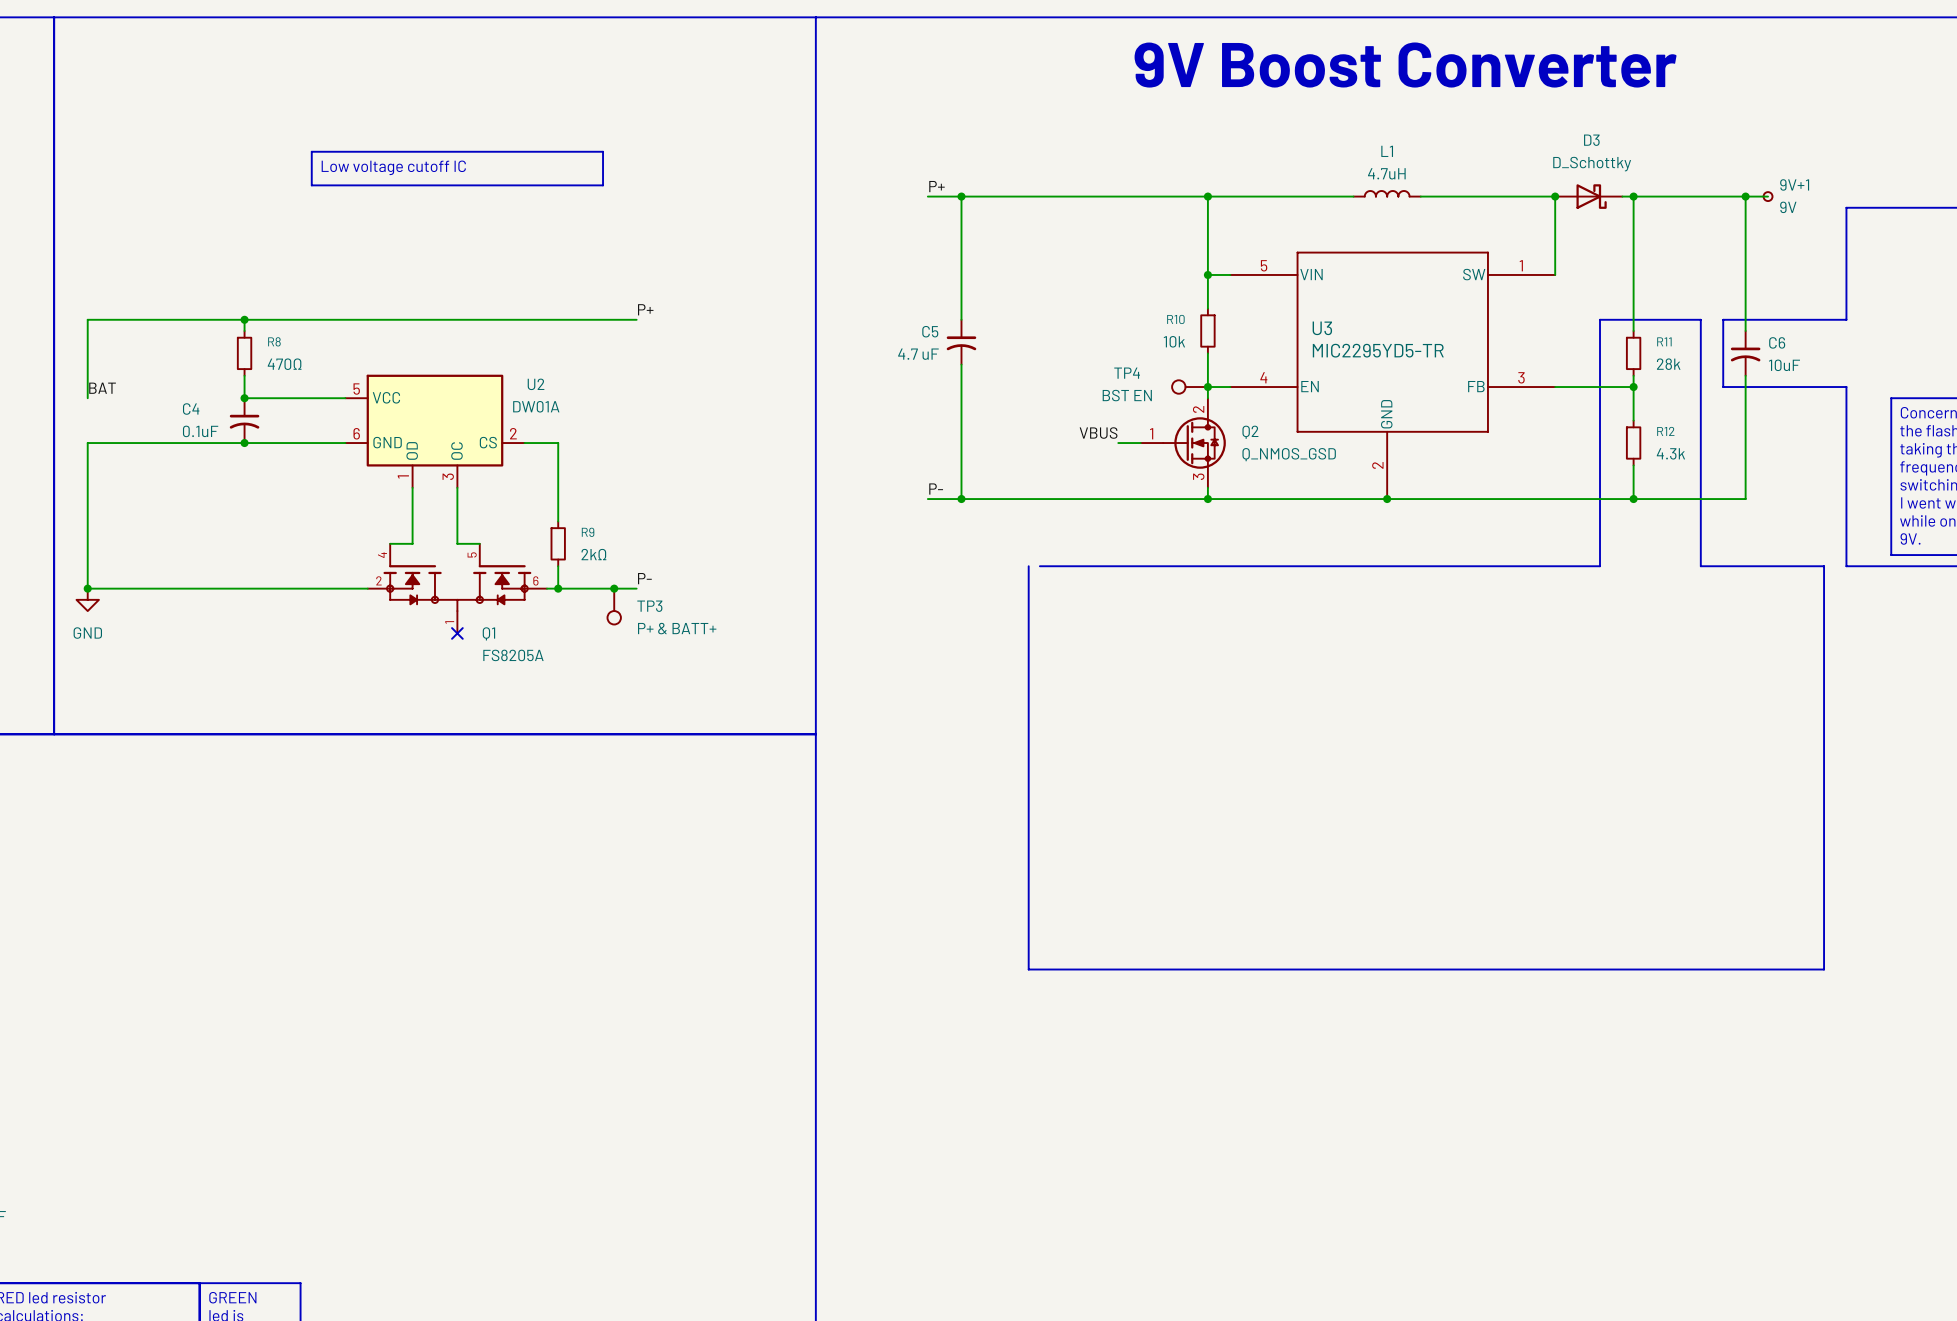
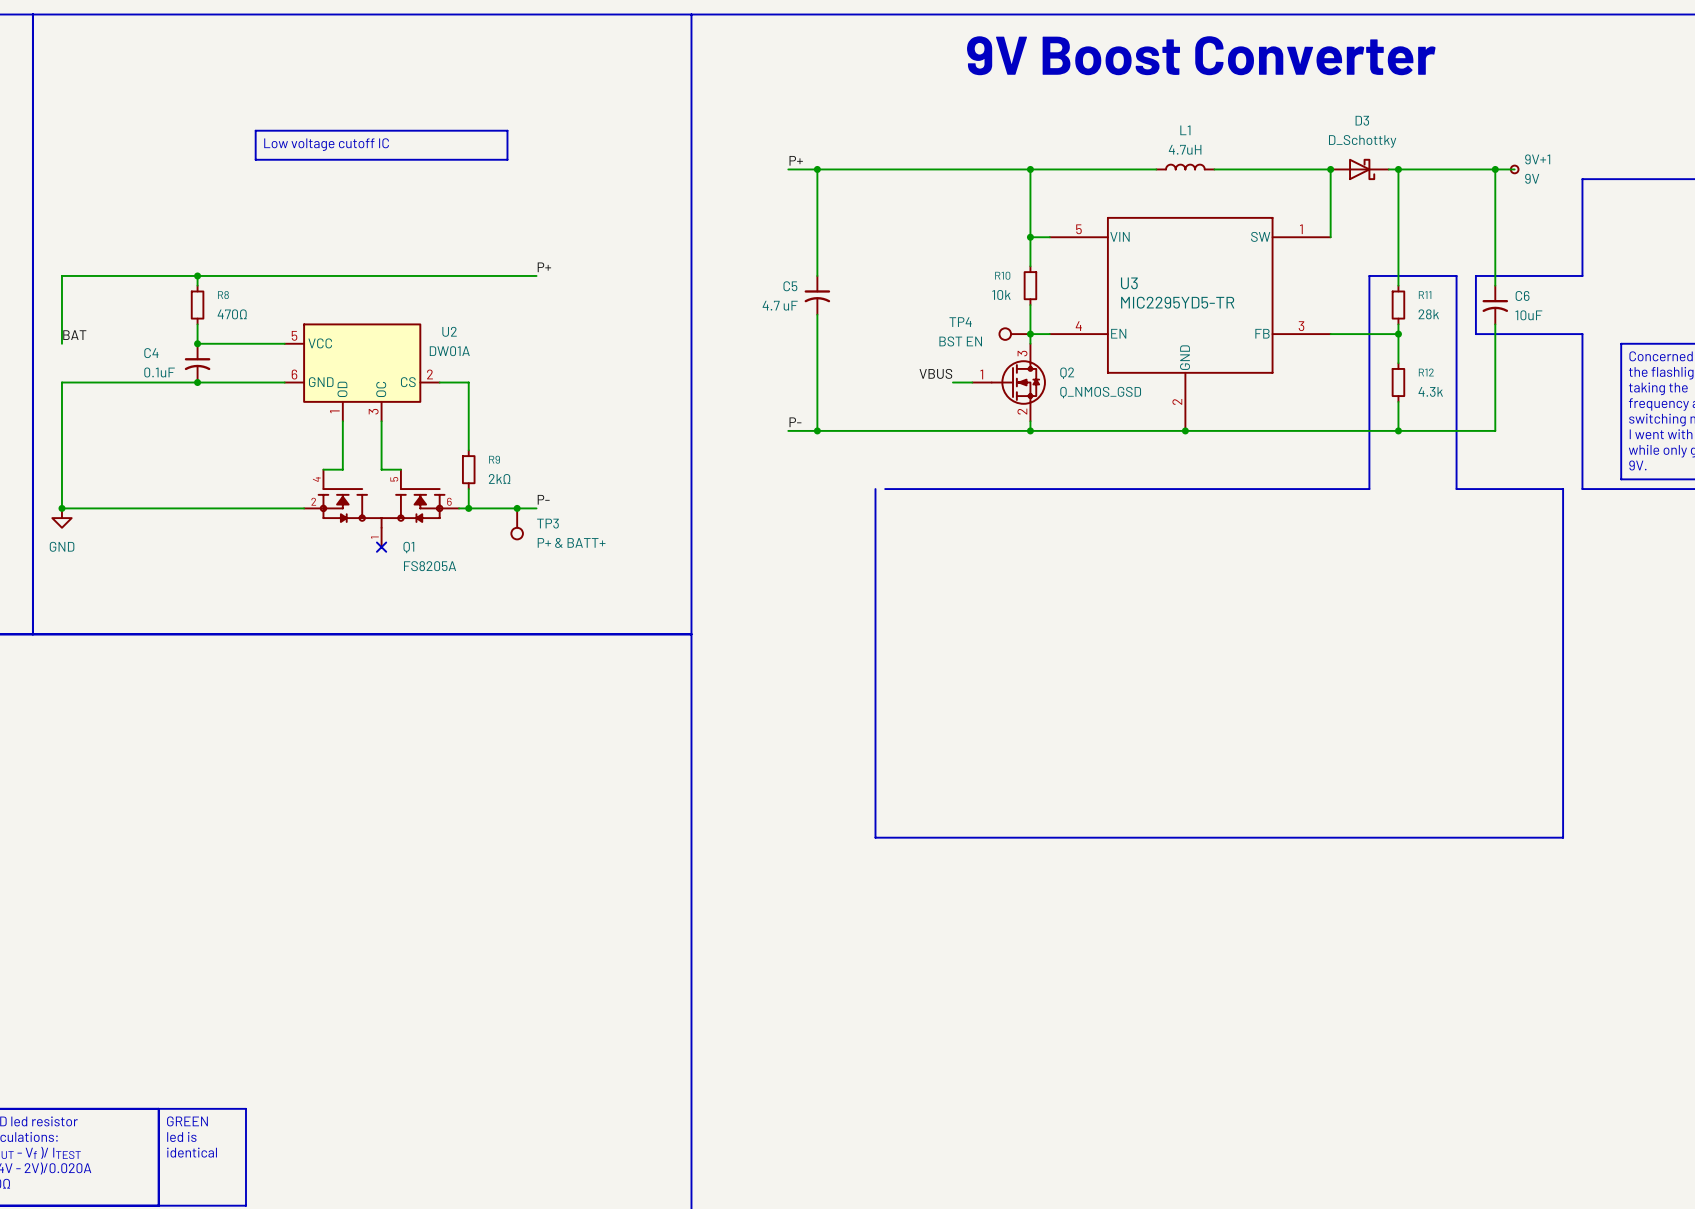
Q2 pin number: 2 (1198, 409) -> 3 (1022, 353)
Q2 pin number: 3 (1198, 476) -> 2 (1022, 411)

